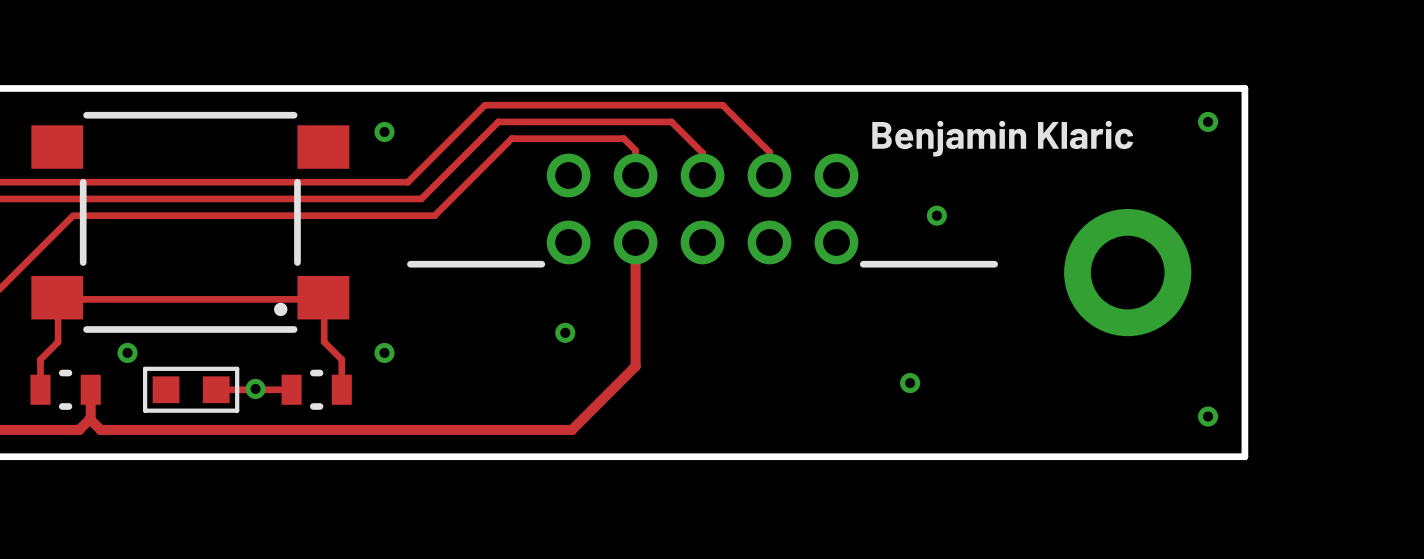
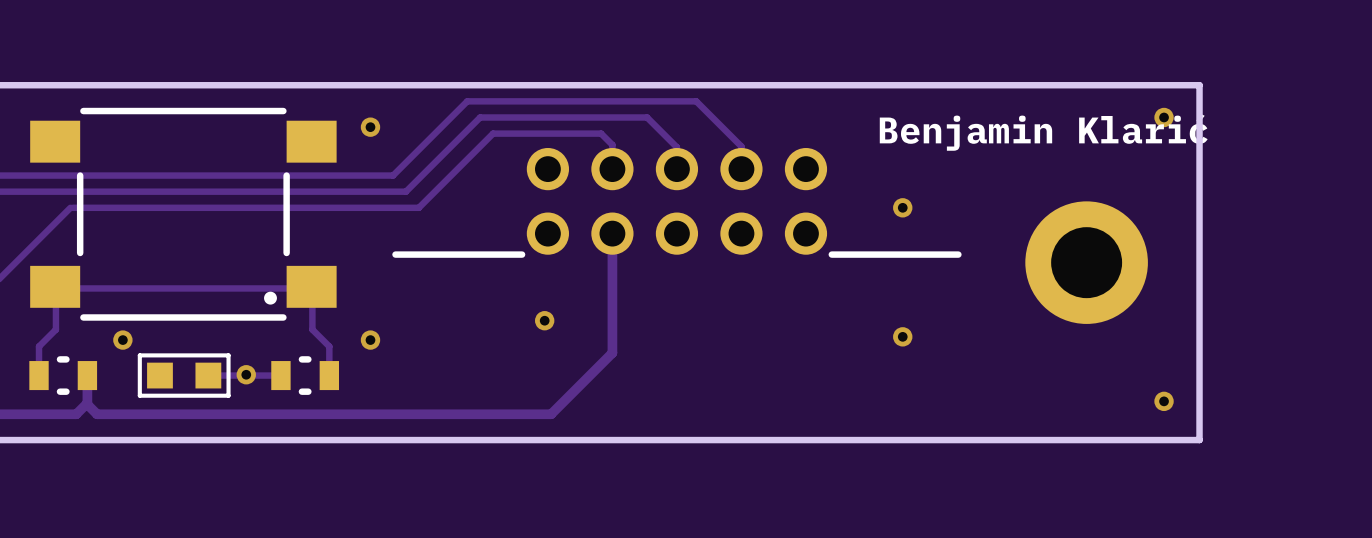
text: Benjamin Klaric (1002, 138) -> Benjamin Klarić (1043, 132)
via position: (910, 383) -> (902, 336)

